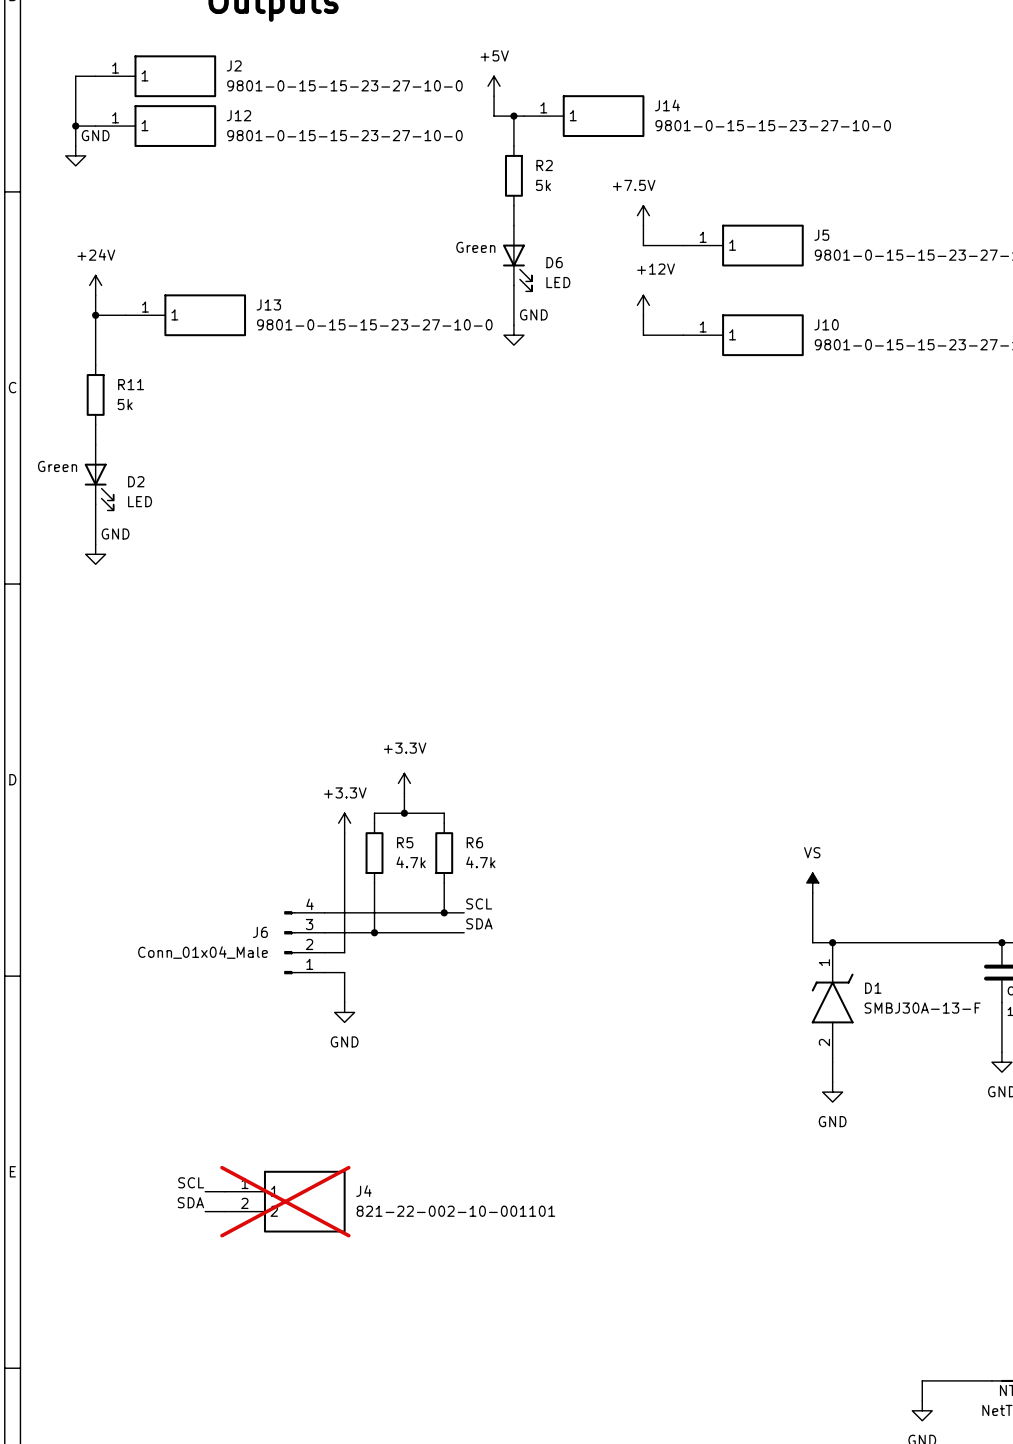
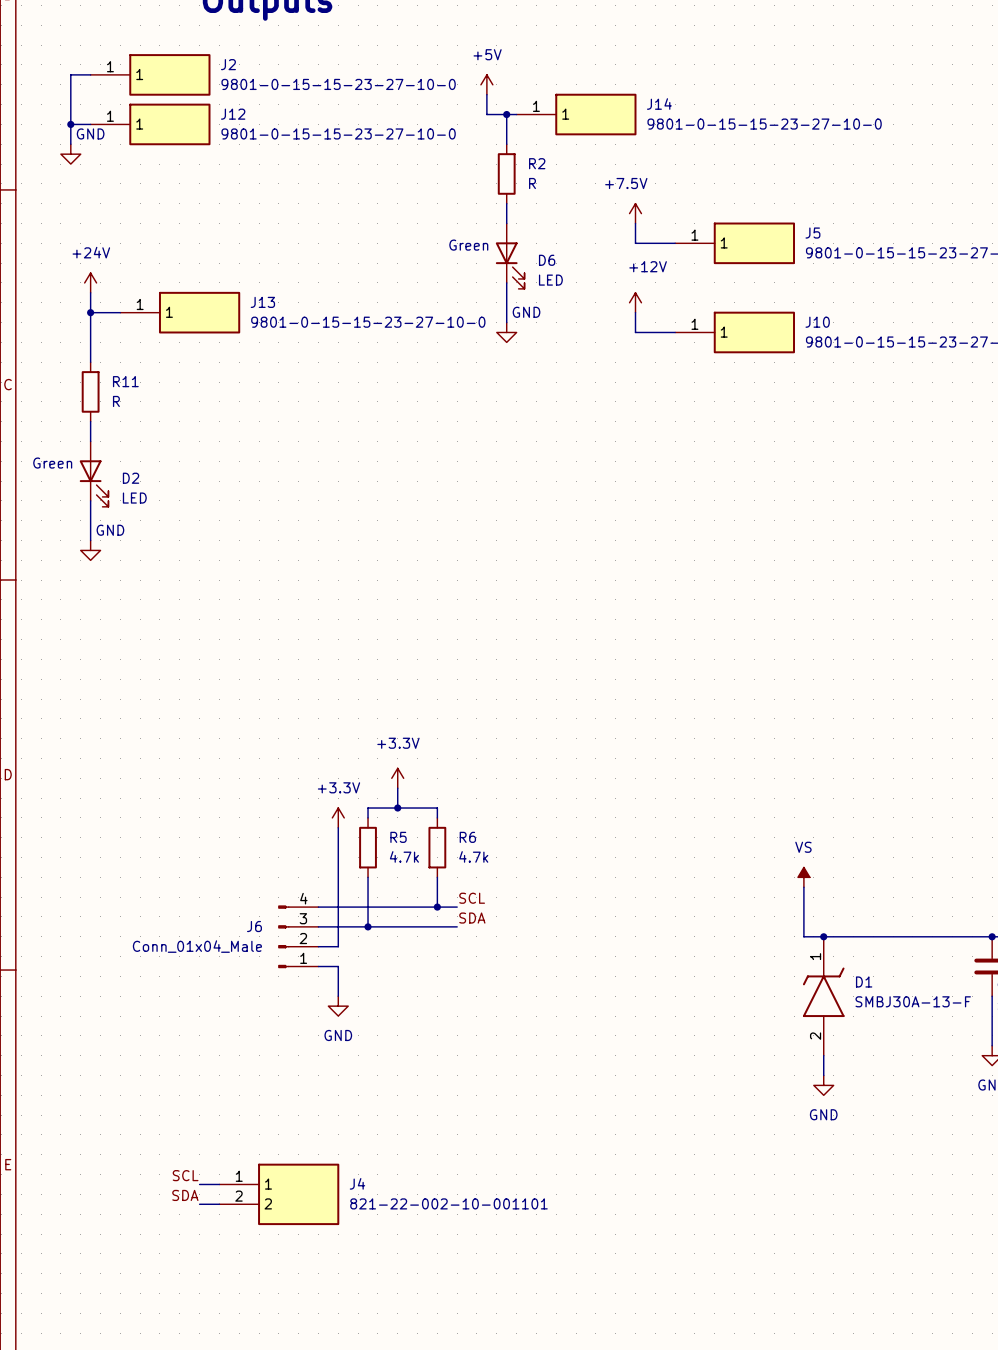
R2 value: 5k (543, 185) -> R (532, 183)
R11 value: 5k (125, 404) -> R (116, 401)
J4 do-not-place cross: (285, 1201) -> none

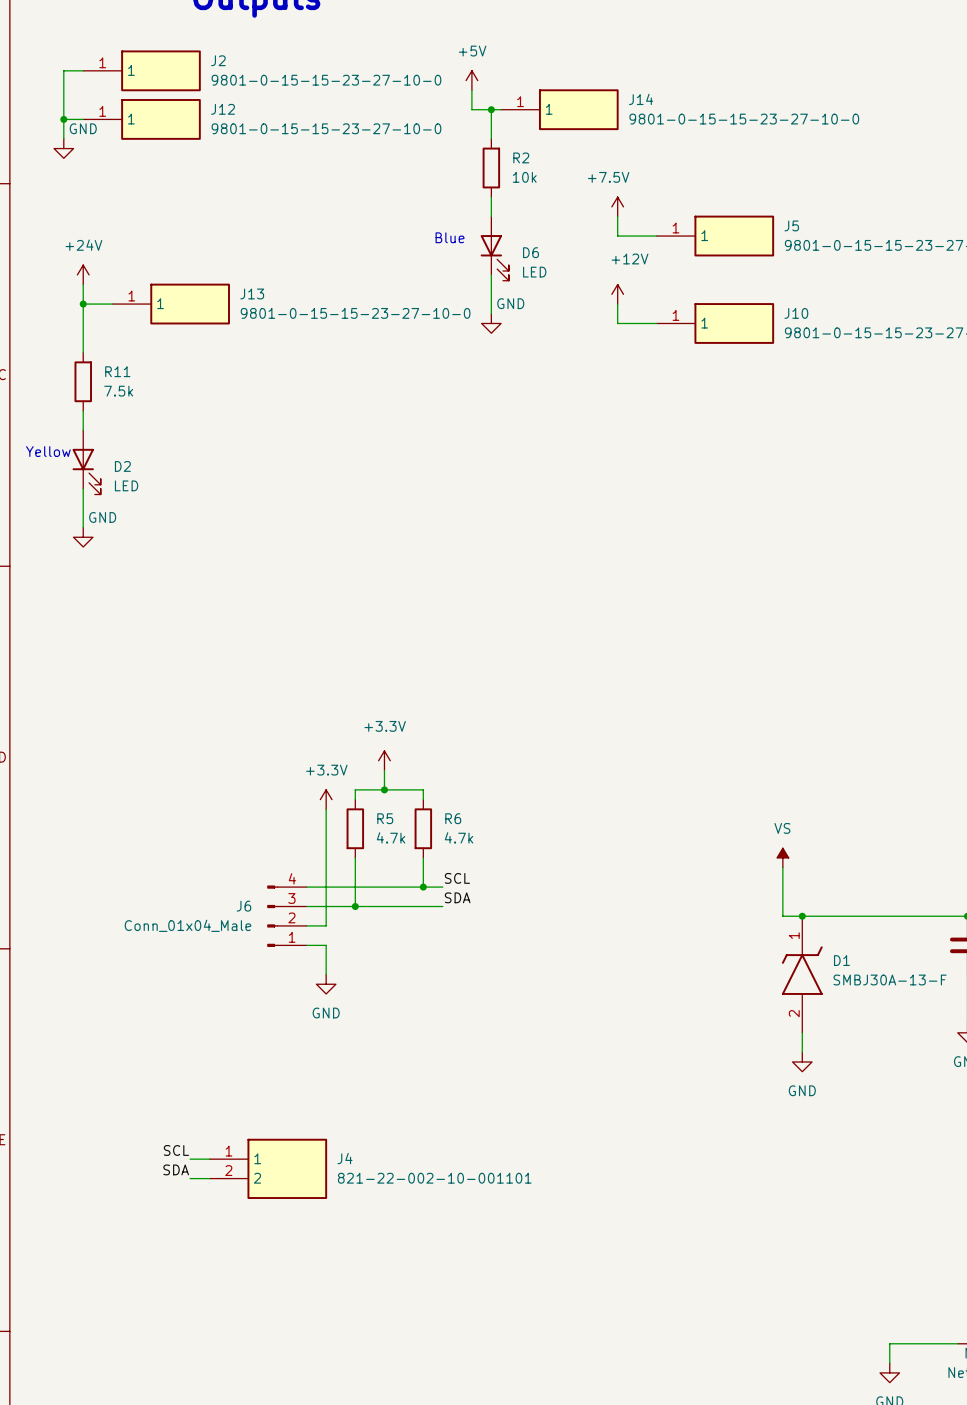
R2 value: R (532, 183) -> 10k (524, 177)
text: Green (468, 245) -> Blue (450, 237)
R11 value: R (116, 401) -> 7.5k (118, 391)
text: Green (52, 463) -> Yellow (48, 451)

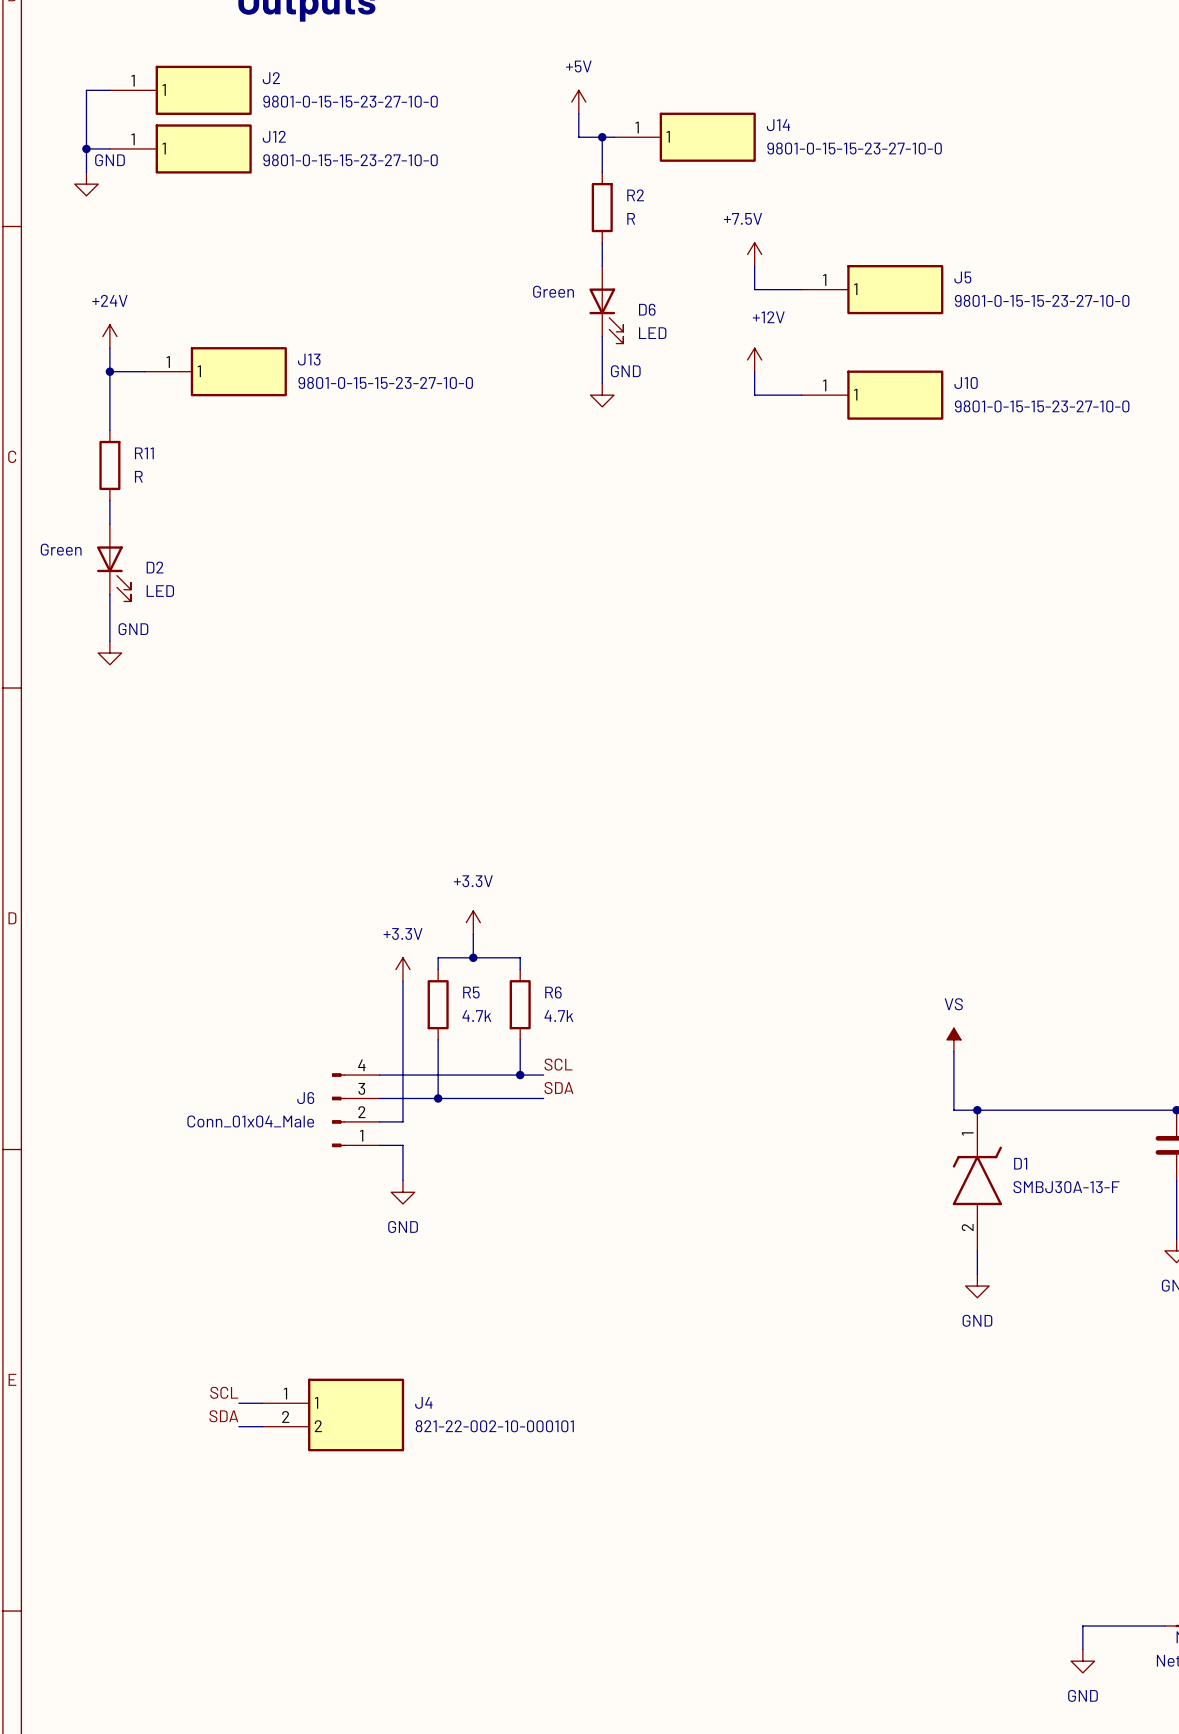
R2 value: 10k (524, 177) -> R (631, 218)
text: Blue (450, 237) -> Green (553, 291)
R11 value: 7.5k (118, 391) -> R (138, 476)
text: Yellow (48, 451) -> Green (61, 549)
J4 value: 821-22-002-10-001101 (434, 1178) -> 821-22-002-10-000101 (494, 1426)

